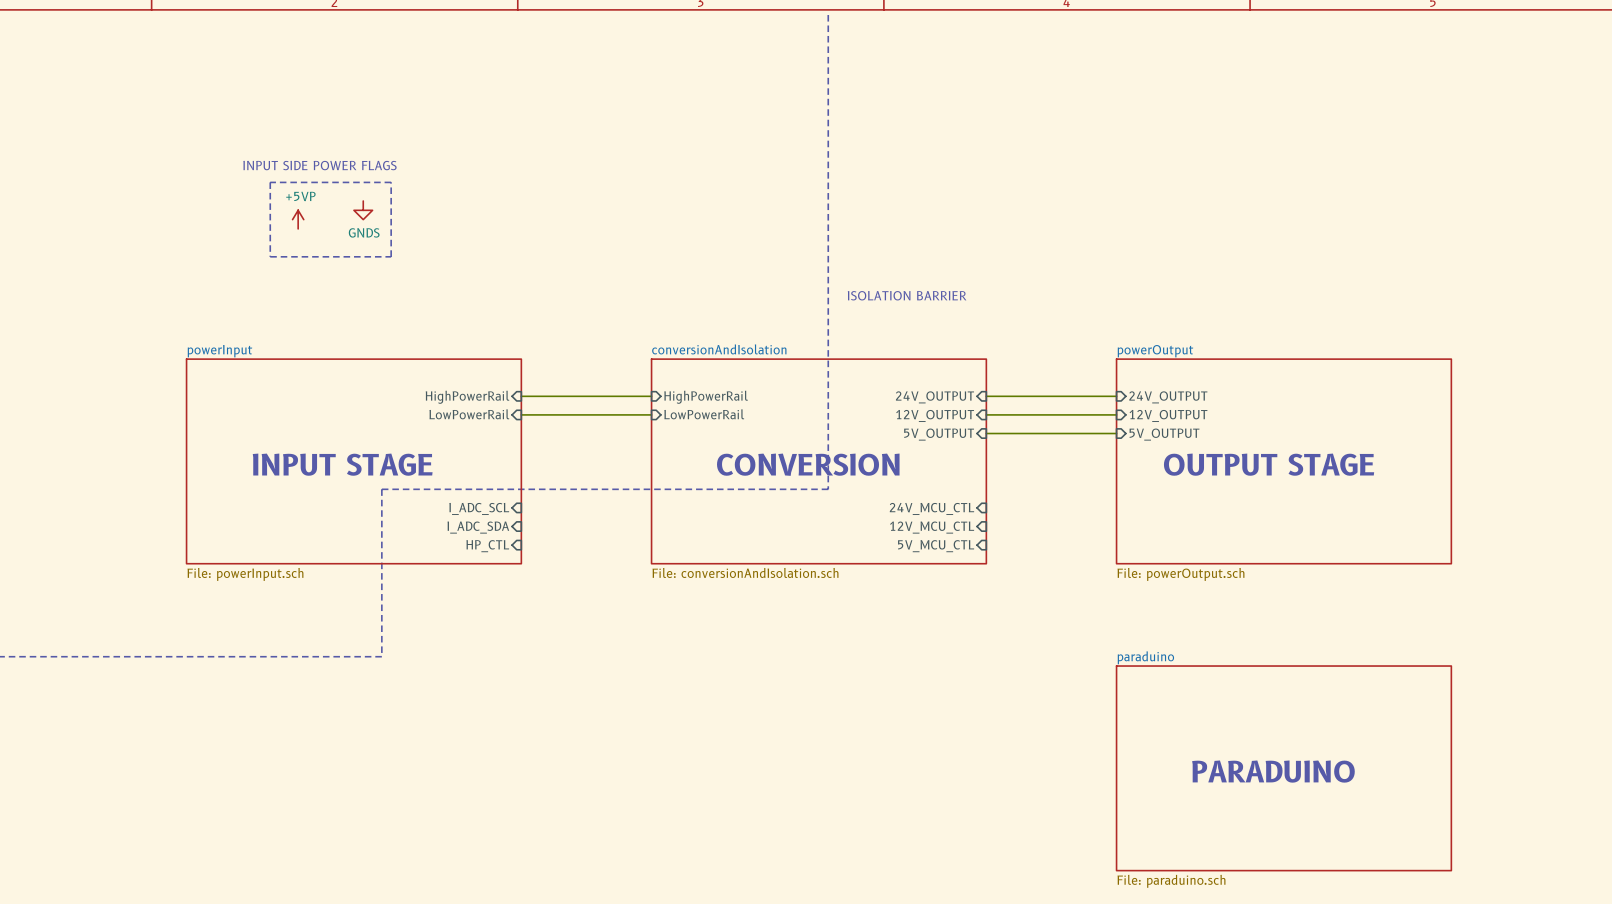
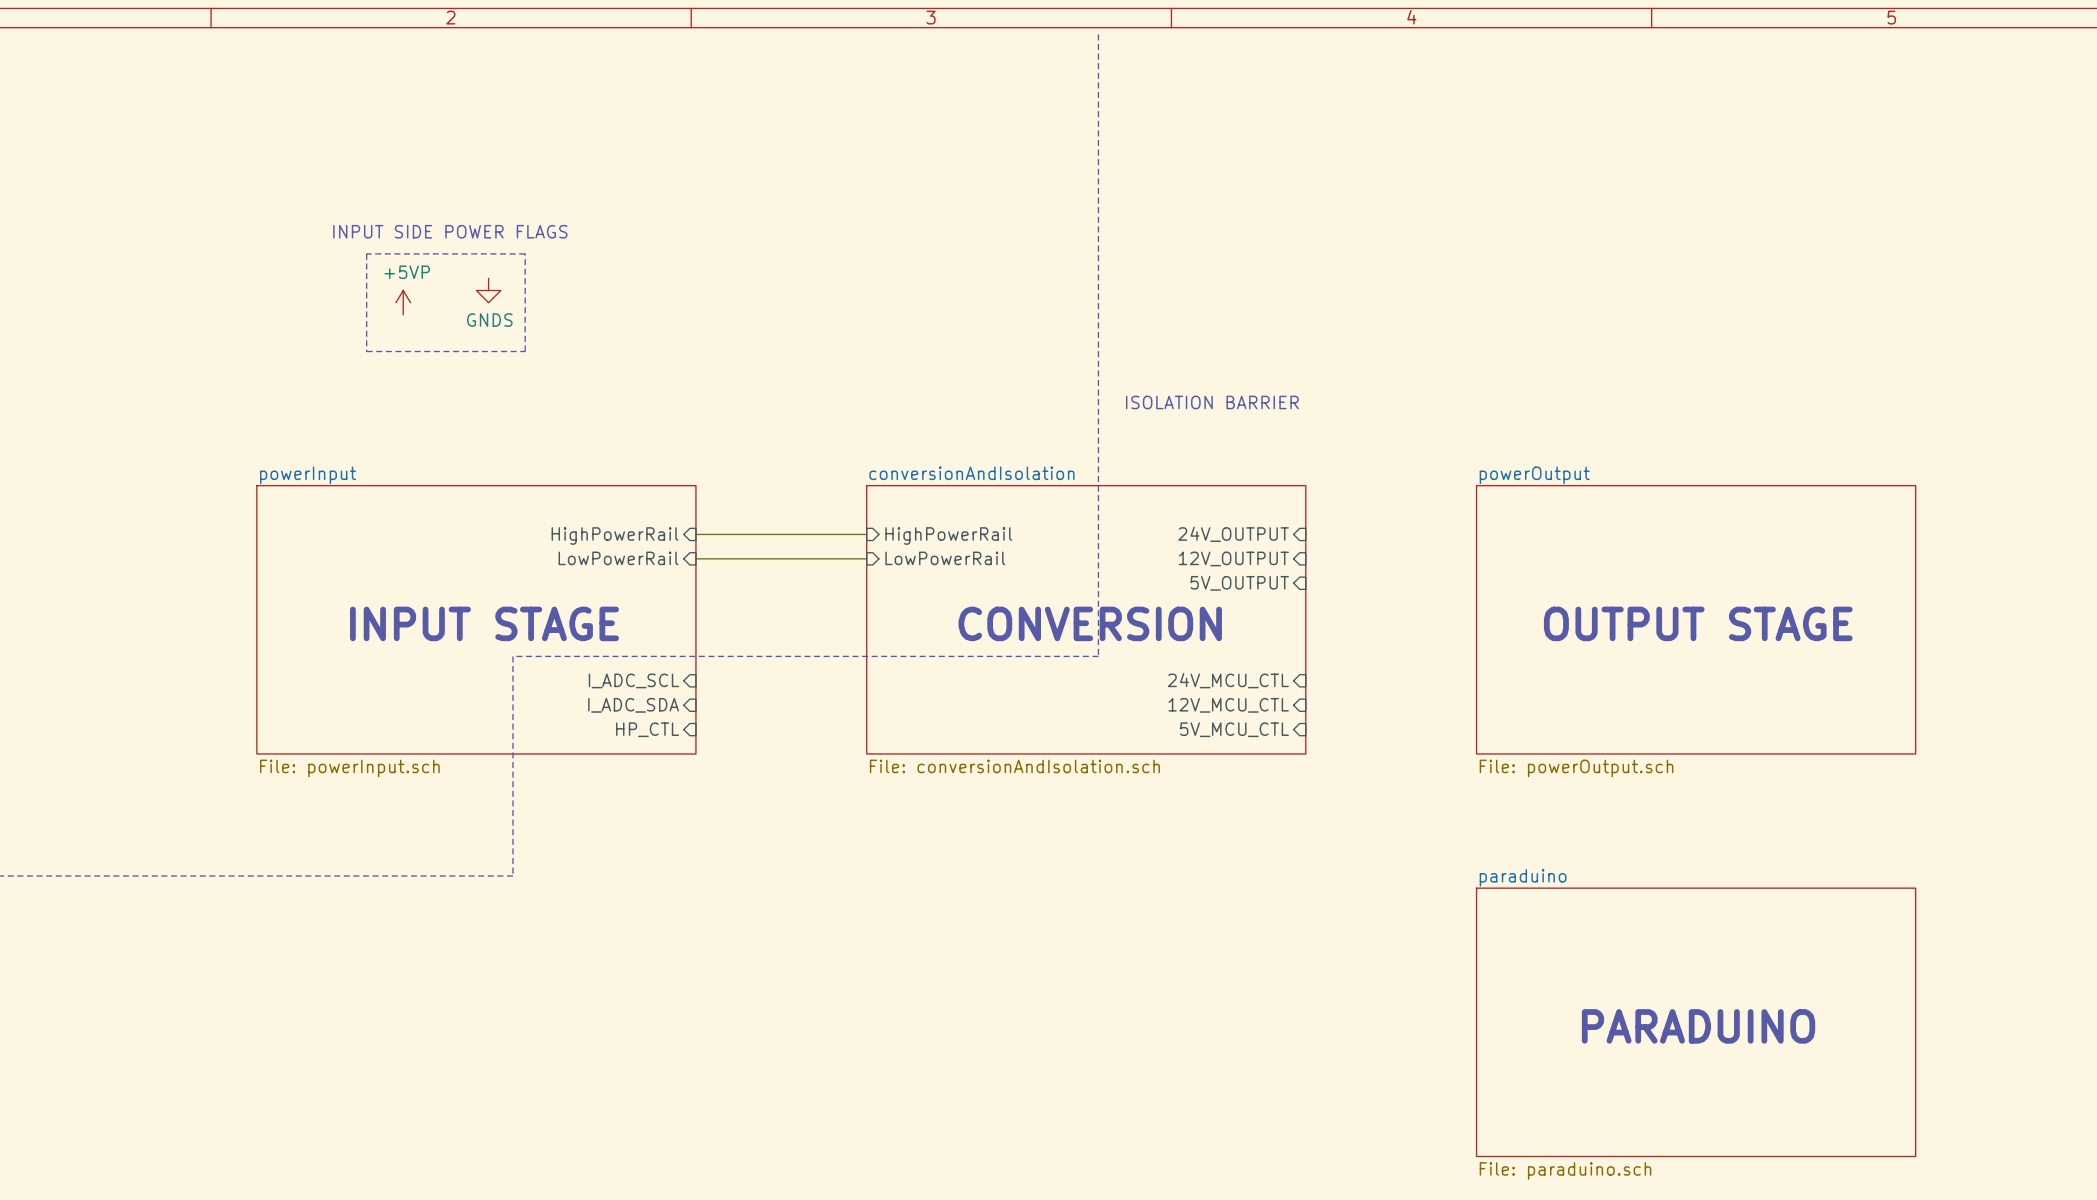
wire: (986, 396) (1116, 396) -> none
sheet pin: 24V_OUTPUT (1168, 397) -> none
wire: (986, 414) (1116, 414) -> none
sheet pin: 12V_OUTPUT (1168, 415) -> none
wire: (986, 433) (1116, 433) -> none
sheet pin: 5V_OUTPUT (1164, 434) -> none

